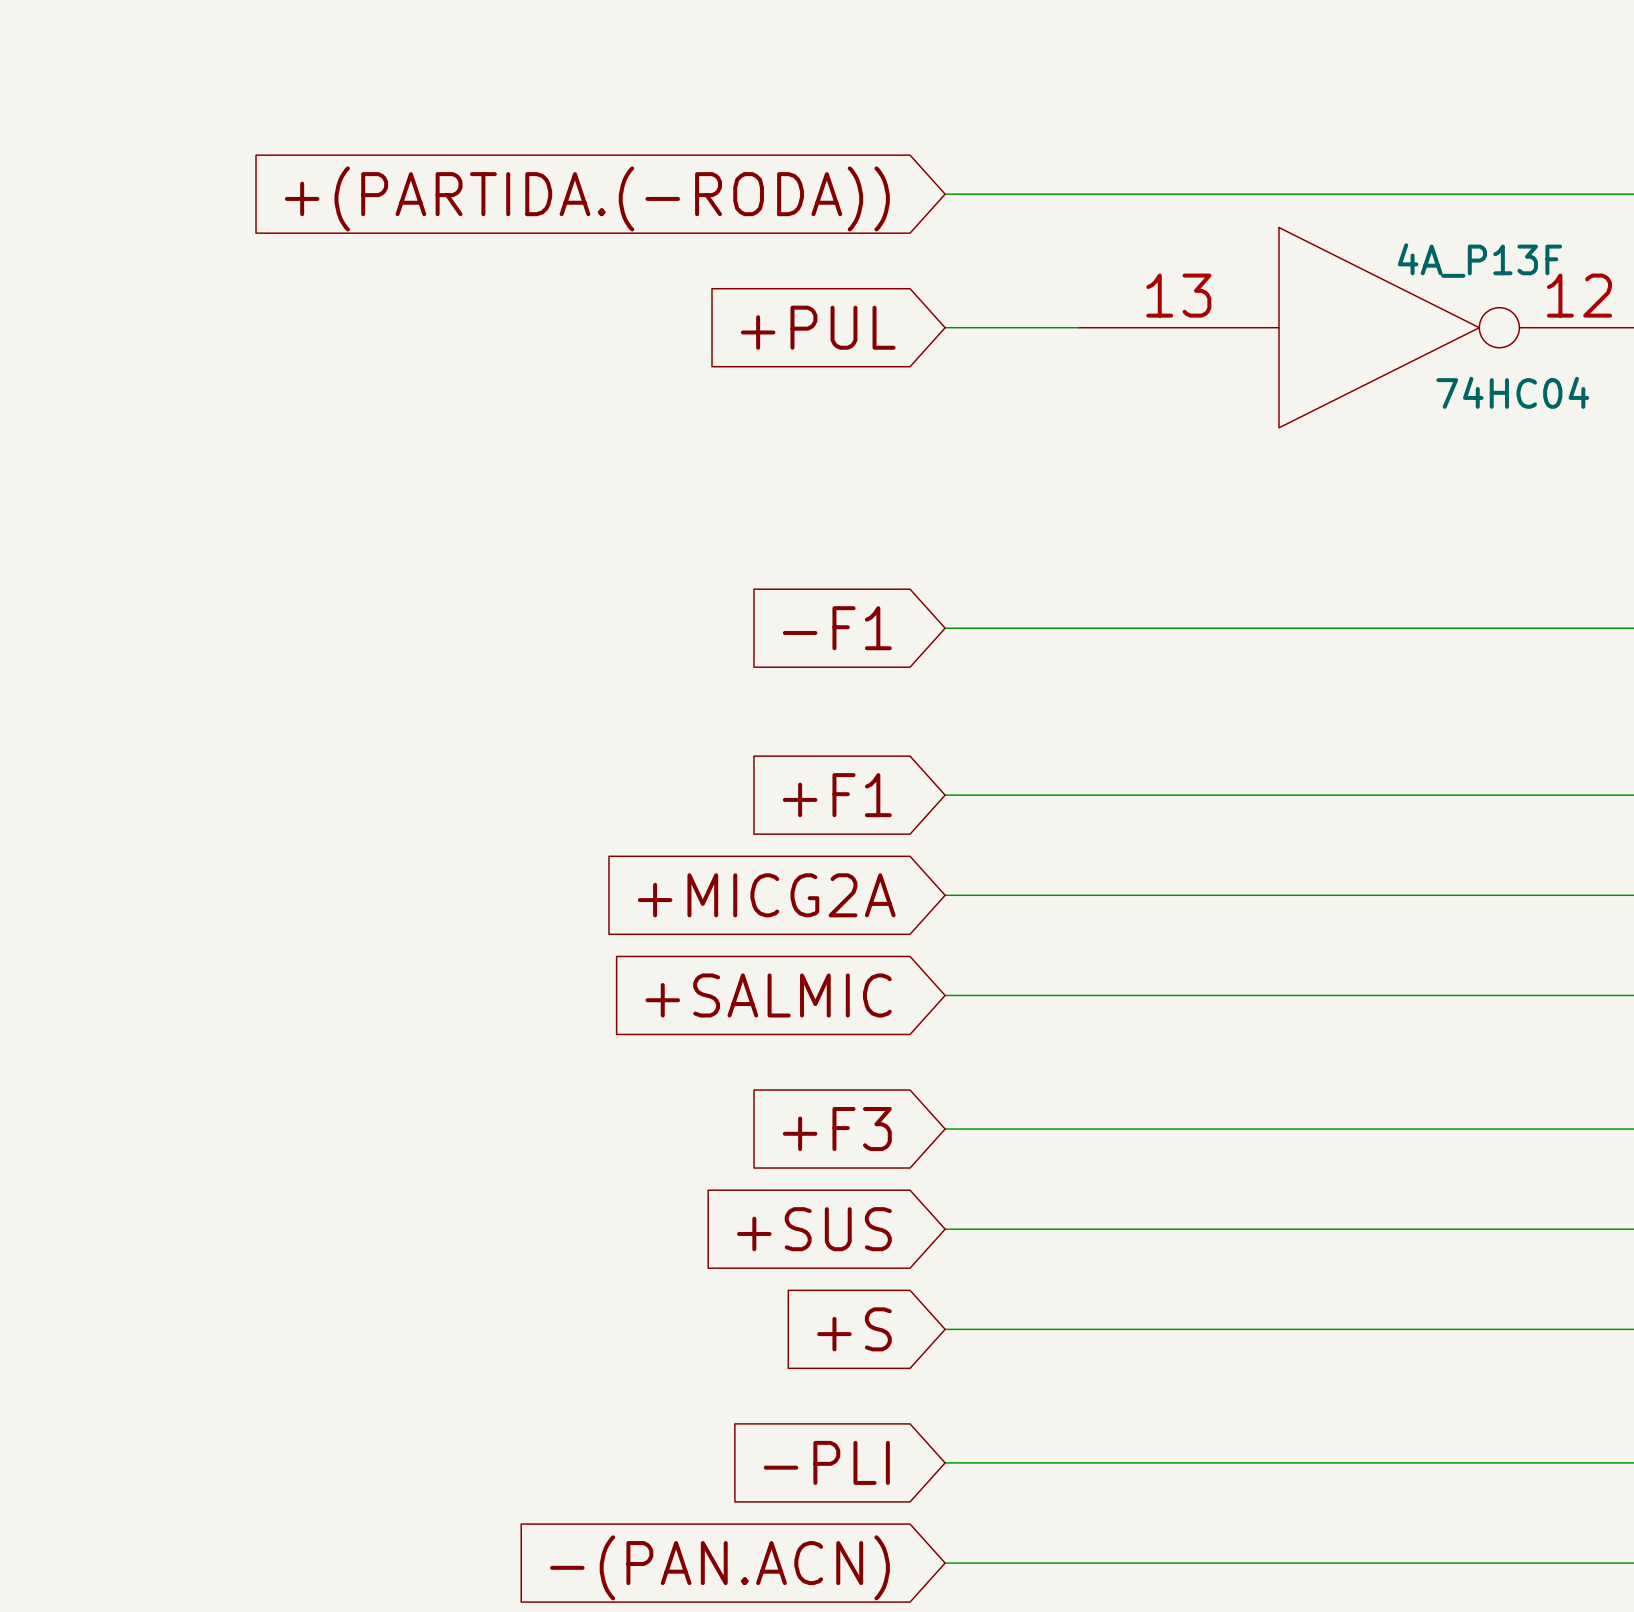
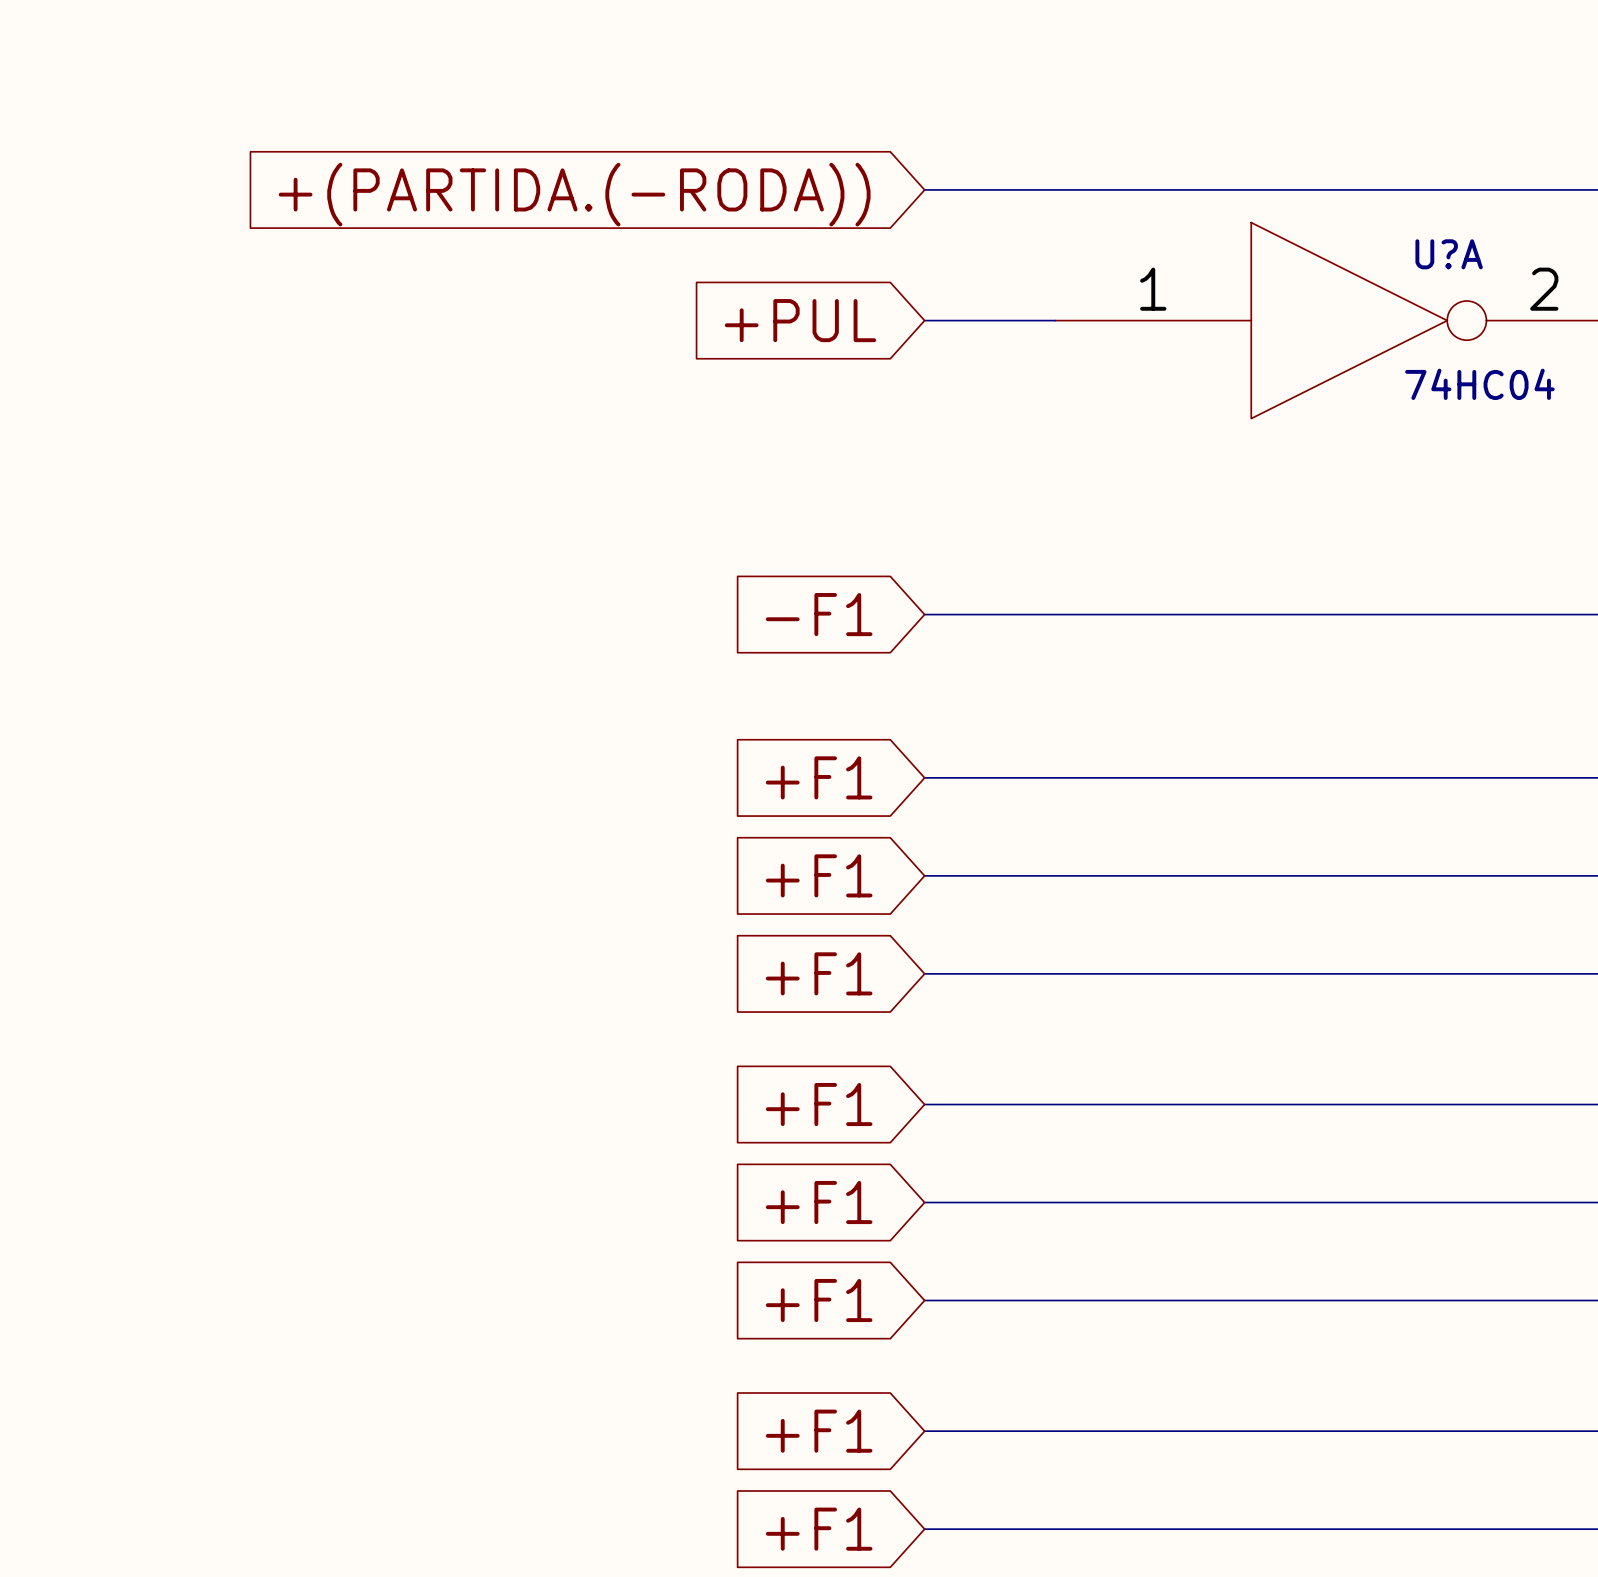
4A_P13F name: 4A_P13F (1479, 260) -> U?A (1449, 254)
4A_P13F pin number: 13 (1178, 295) -> 1 (1153, 289)
4A_P13F pin number: 12 (1579, 295) -> 2 (1544, 289)
global label: +MICG2A (766, 895) -> +F1 (819, 875)
global label: +SALMIC (768, 995) -> +F1 (819, 973)
global label: +F3 (837, 1129) -> +F1 (819, 1104)
global label: +SUS (814, 1229) -> +F1 (819, 1202)
global label: +S (854, 1329) -> +F1 (819, 1300)
global label: -PLI (826, 1462) -> +F1 (819, 1431)
global label: -(PAN.ACN) (719, 1567) -> +F1 (819, 1529)

